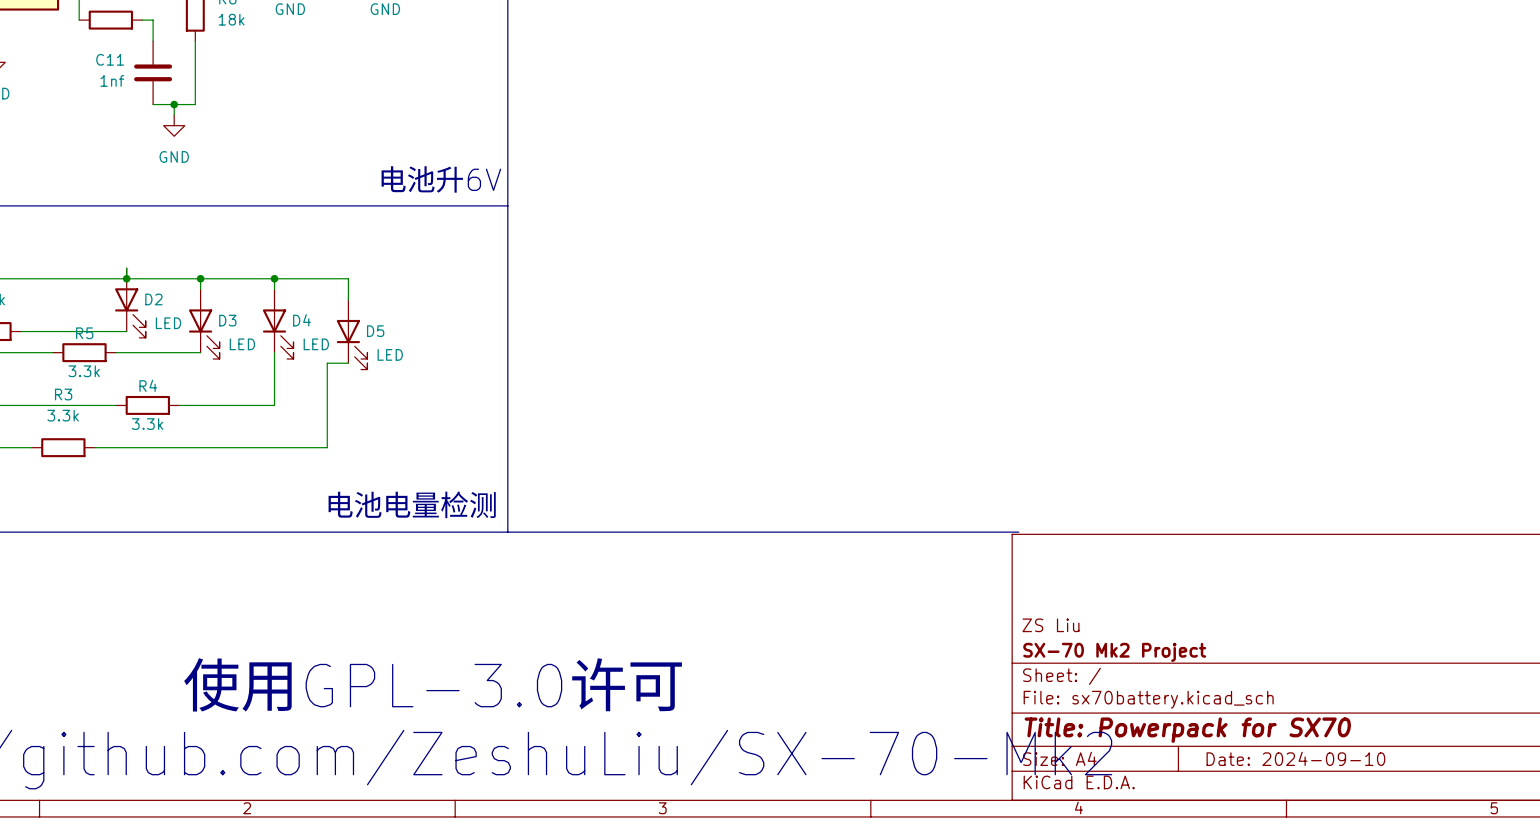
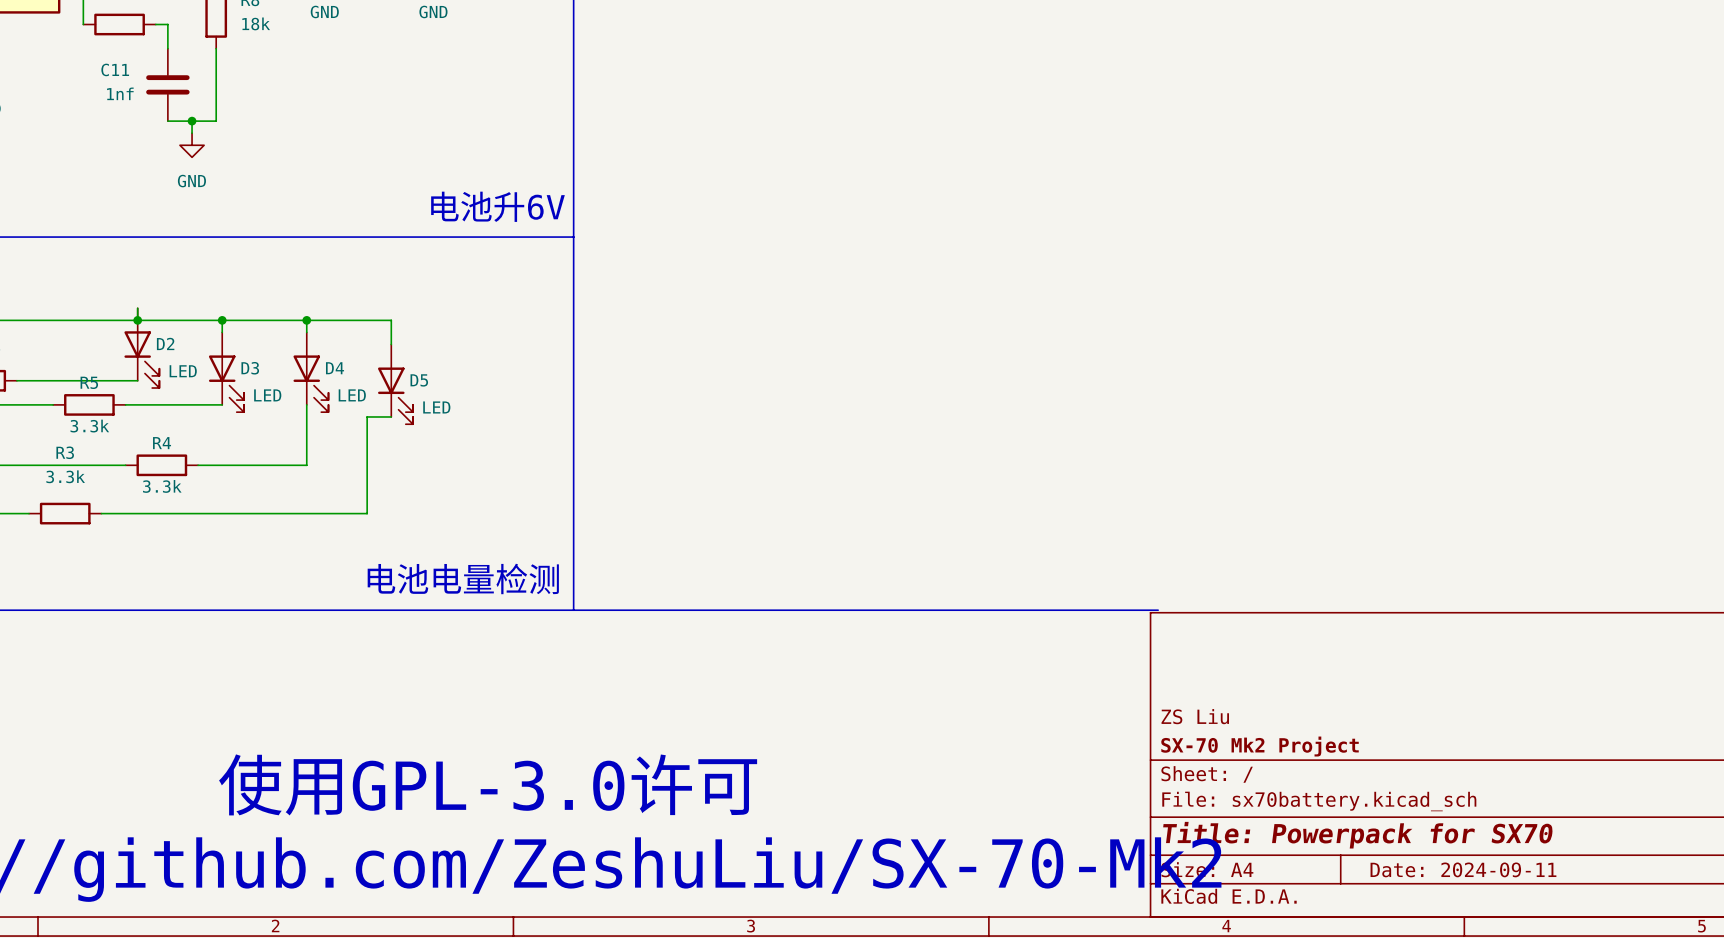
title block: Date: 2024-09-10 (1295, 758) -> Date: 2024-09-11 (1463, 869)

